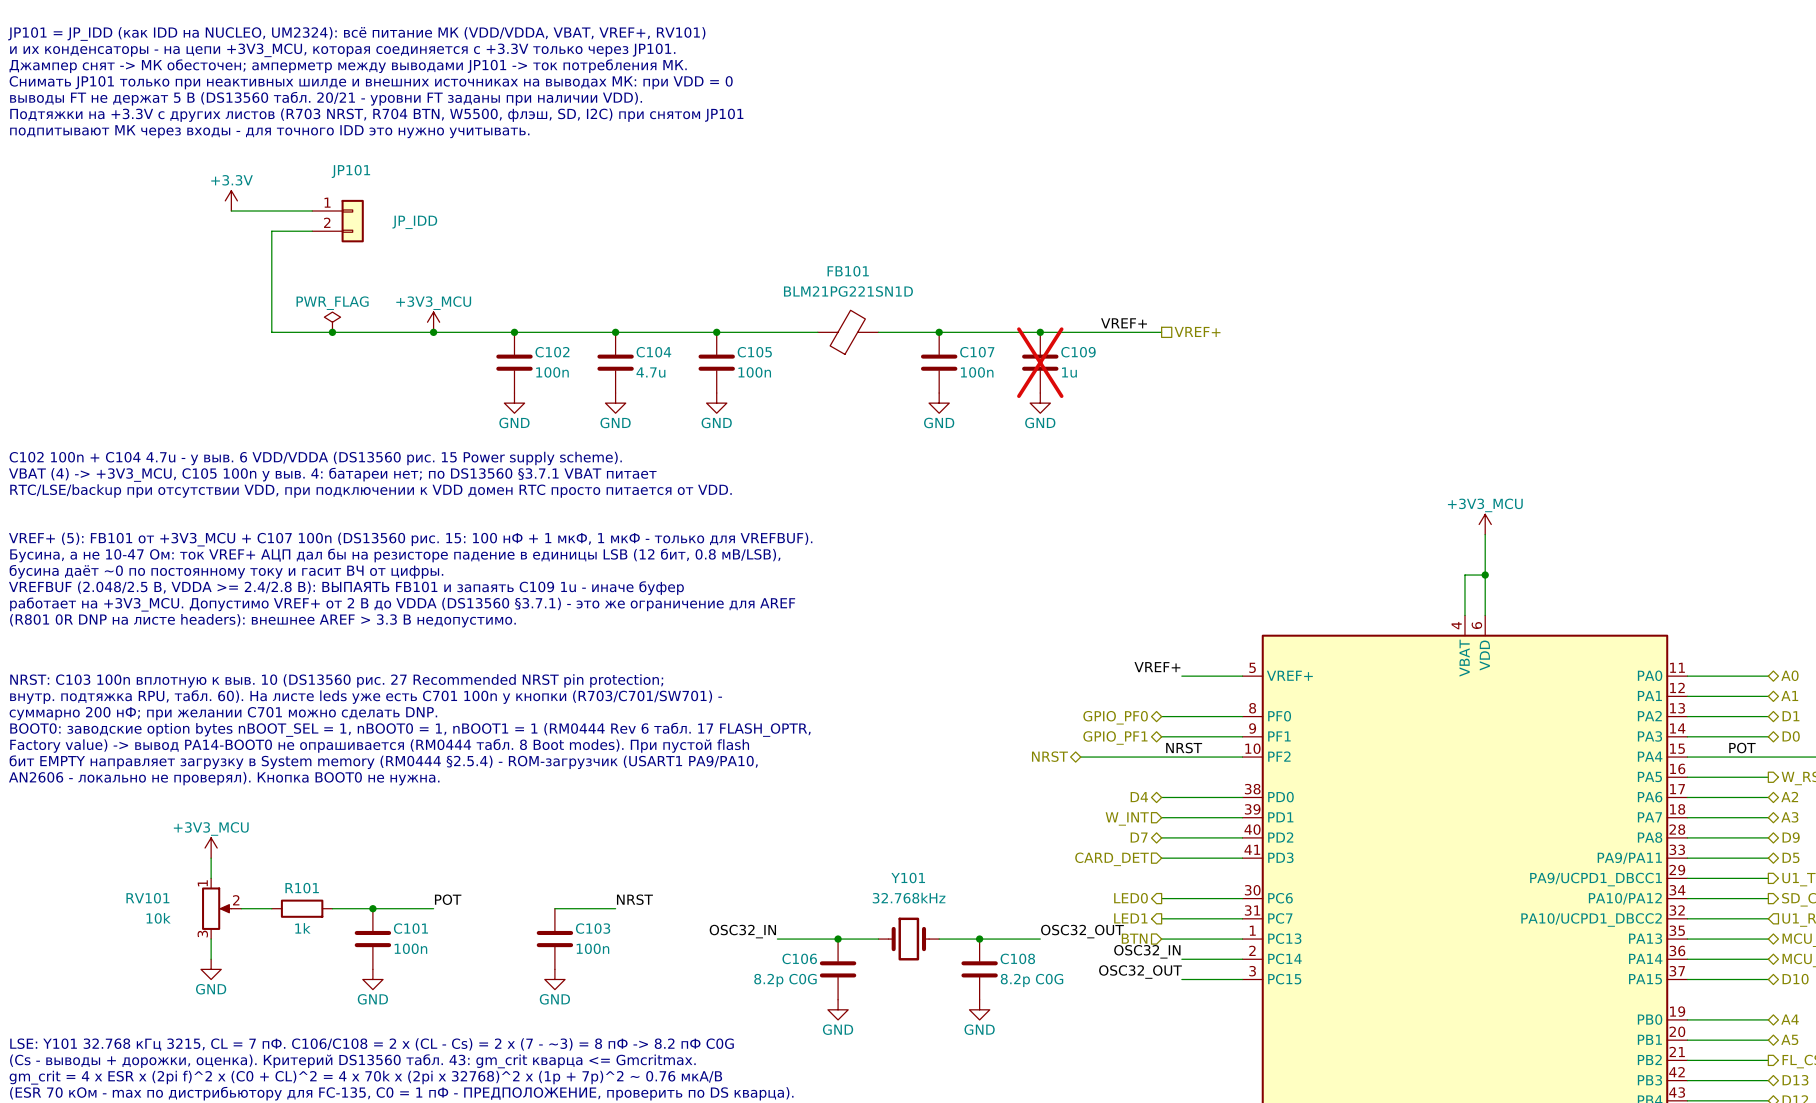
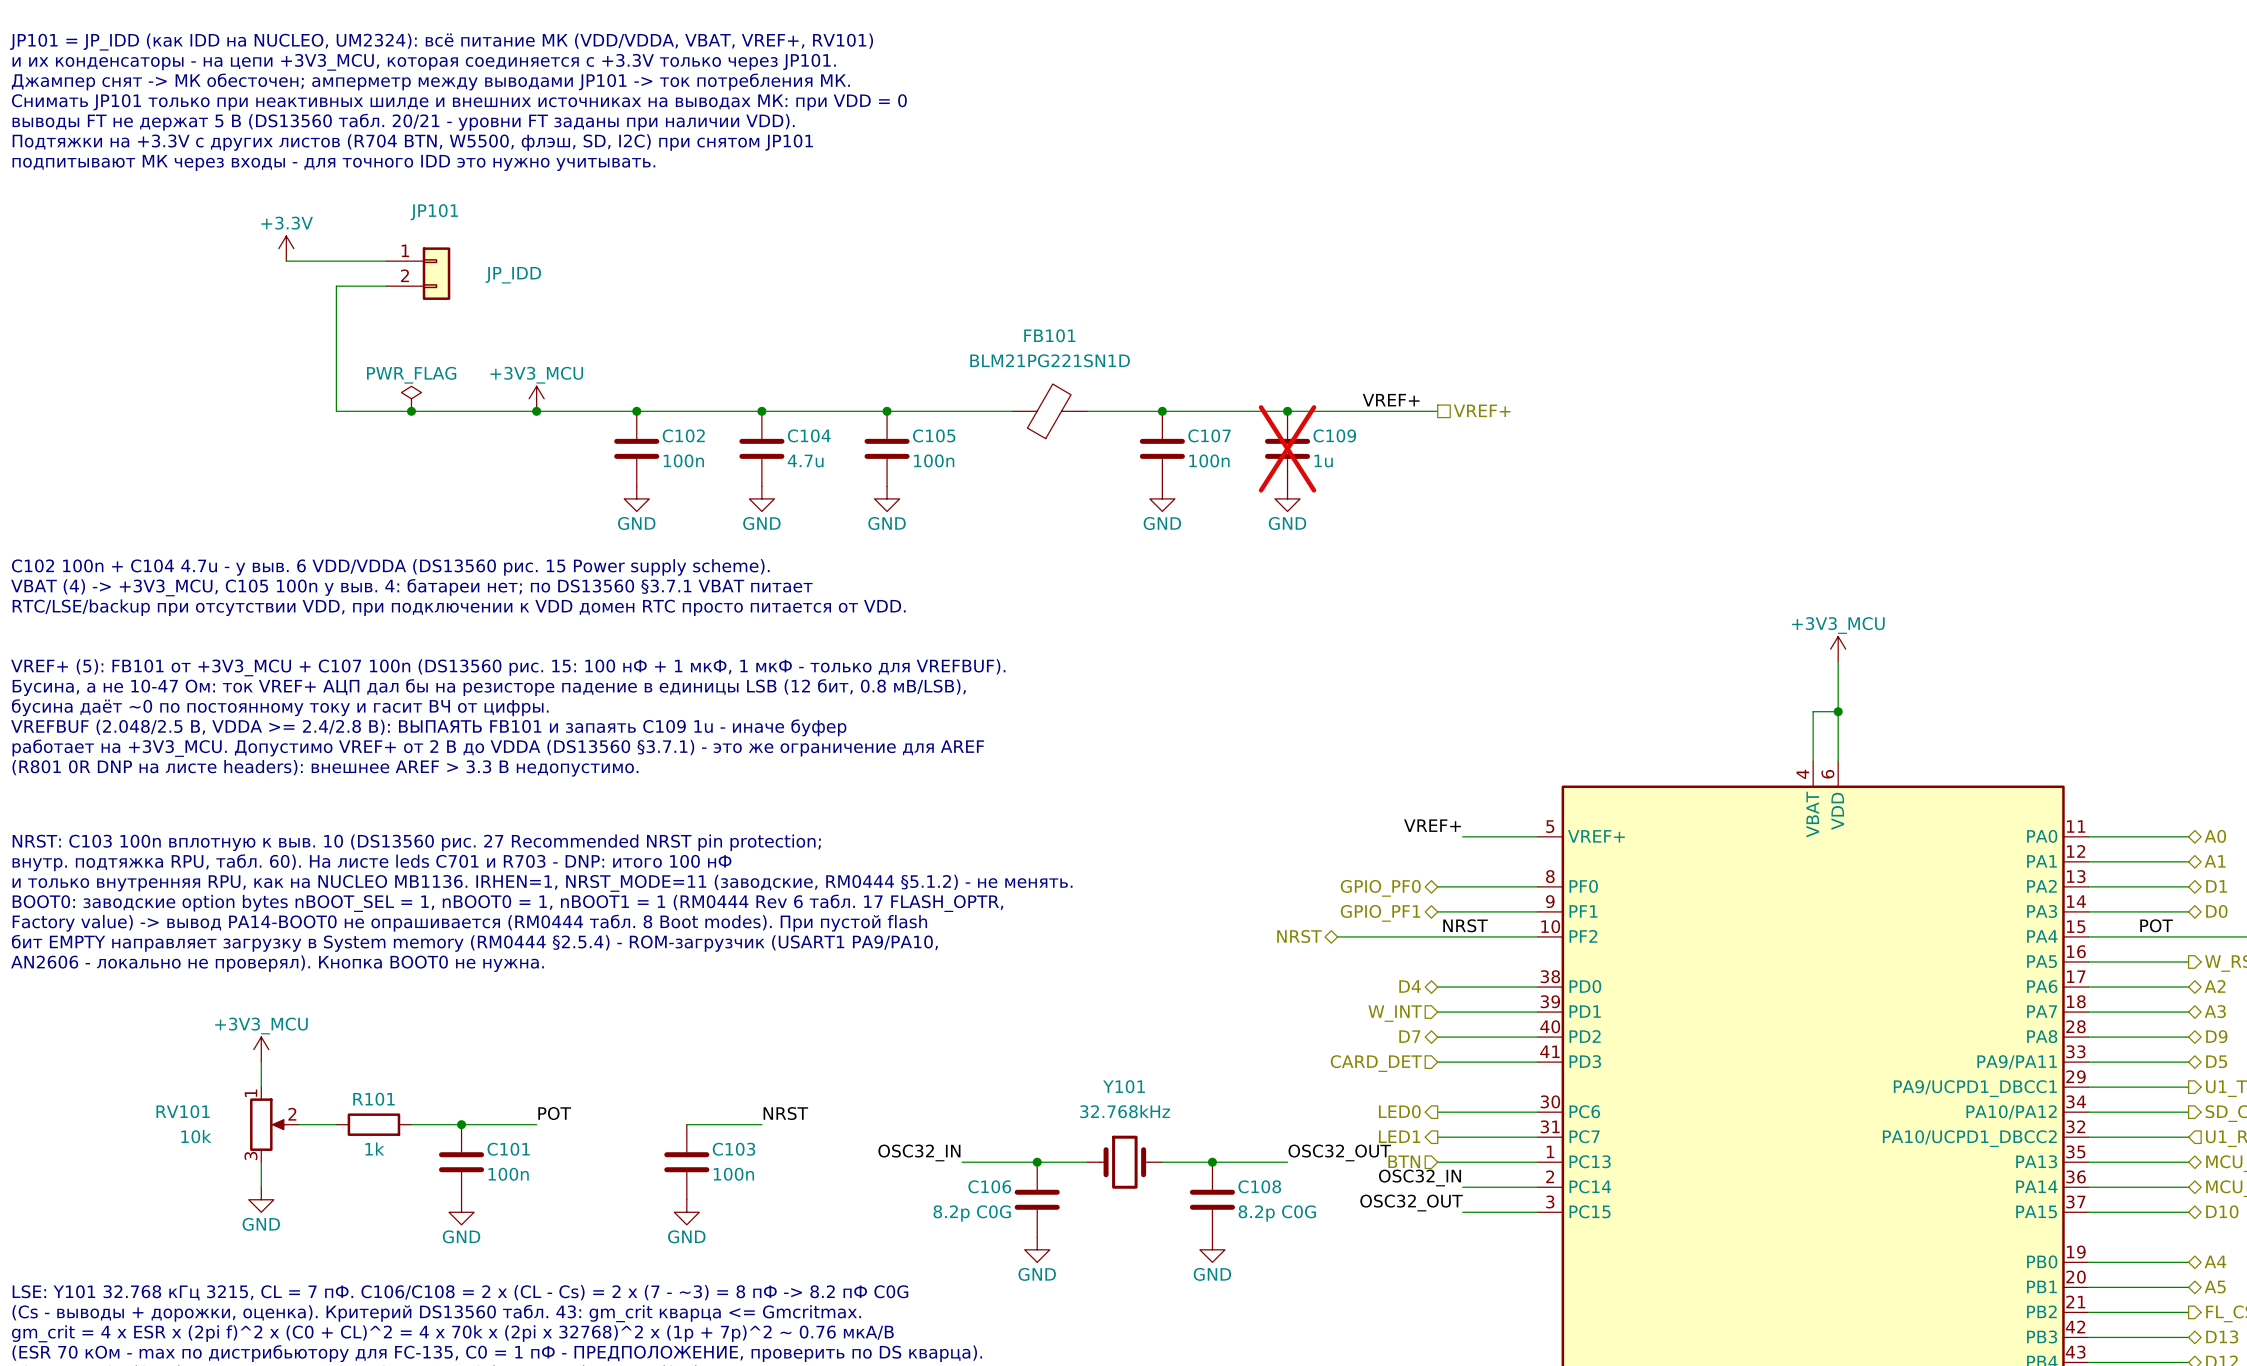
text: Подтяжки на +3.3V с других листов (R703 NRST, R704 BTN, W5500, флэш, SD, I2C) при снятом JP101 (376, 115) -> Подтяжки на +3.3V с других листов (R704 BTN, W5500, флэш, SD, I2C) при снятом JP101 (412, 142)
text: внутр. подтяжка RPU, табл. 60). На листе leds уже есть C701 100n у кнопки (R703/C701/SW701) - (366, 697) -> внутр. подтяжка RPU, табл. 60). На листе leds C701 и R703 - DNP: итого 100 нФ (372, 862)
text: суммарно 200 нФ; при желании C701 можно сделать DNP. (223, 713) -> и только внутренняя RPU, как на NUCLEO MB1136. IRHEN=1, NRST_MODE=11 (заводские, RM0444 §5.1.2) - не менять. (542, 883)

